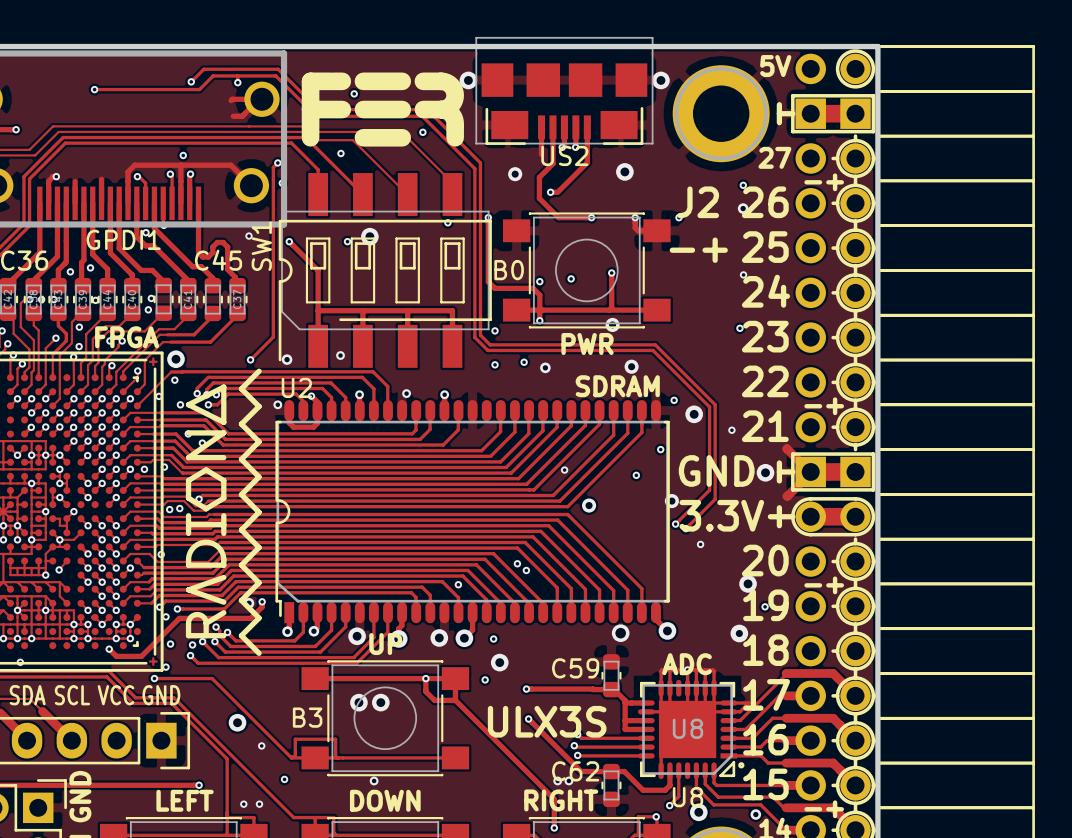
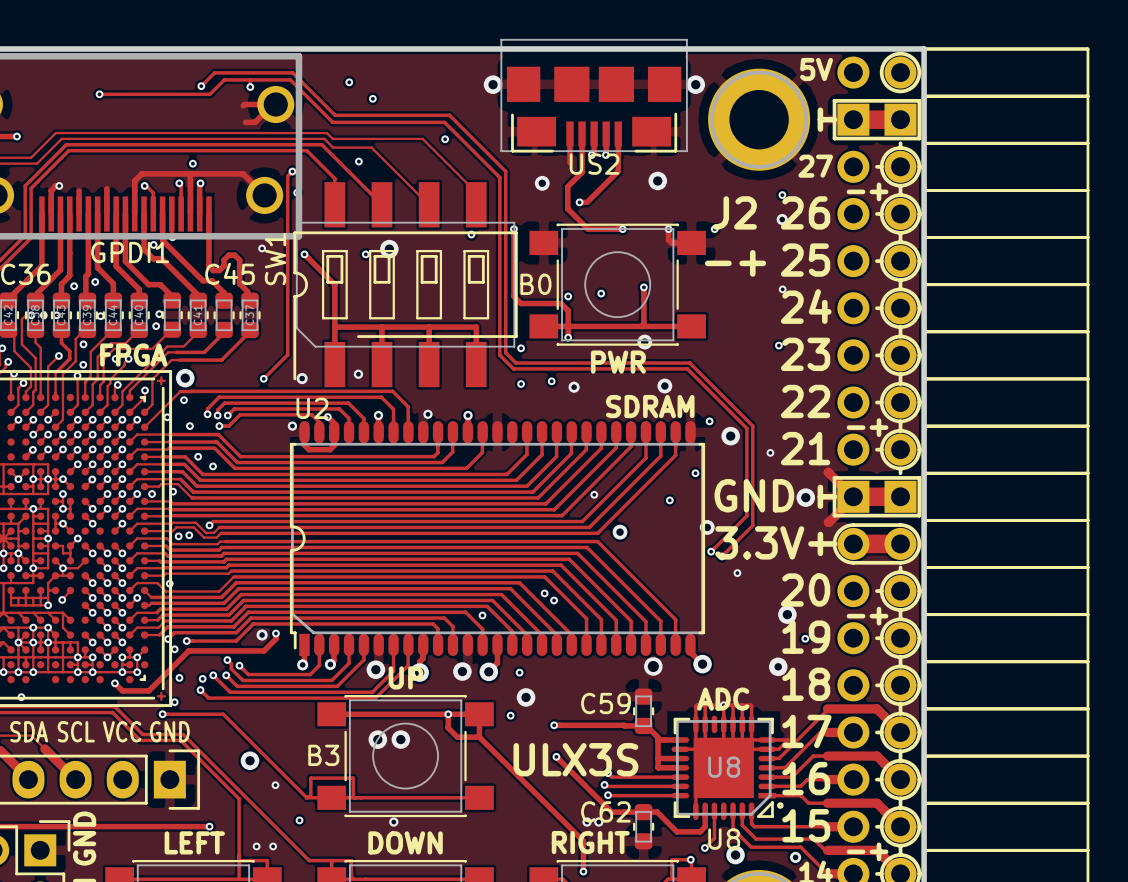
drawing: [301, 72, 464, 147] -> none
drawing: [185, 368, 262, 656] -> none
via: none -> (33, 627)
via: none -> (48, 627)
via: none -> (33, 642)

